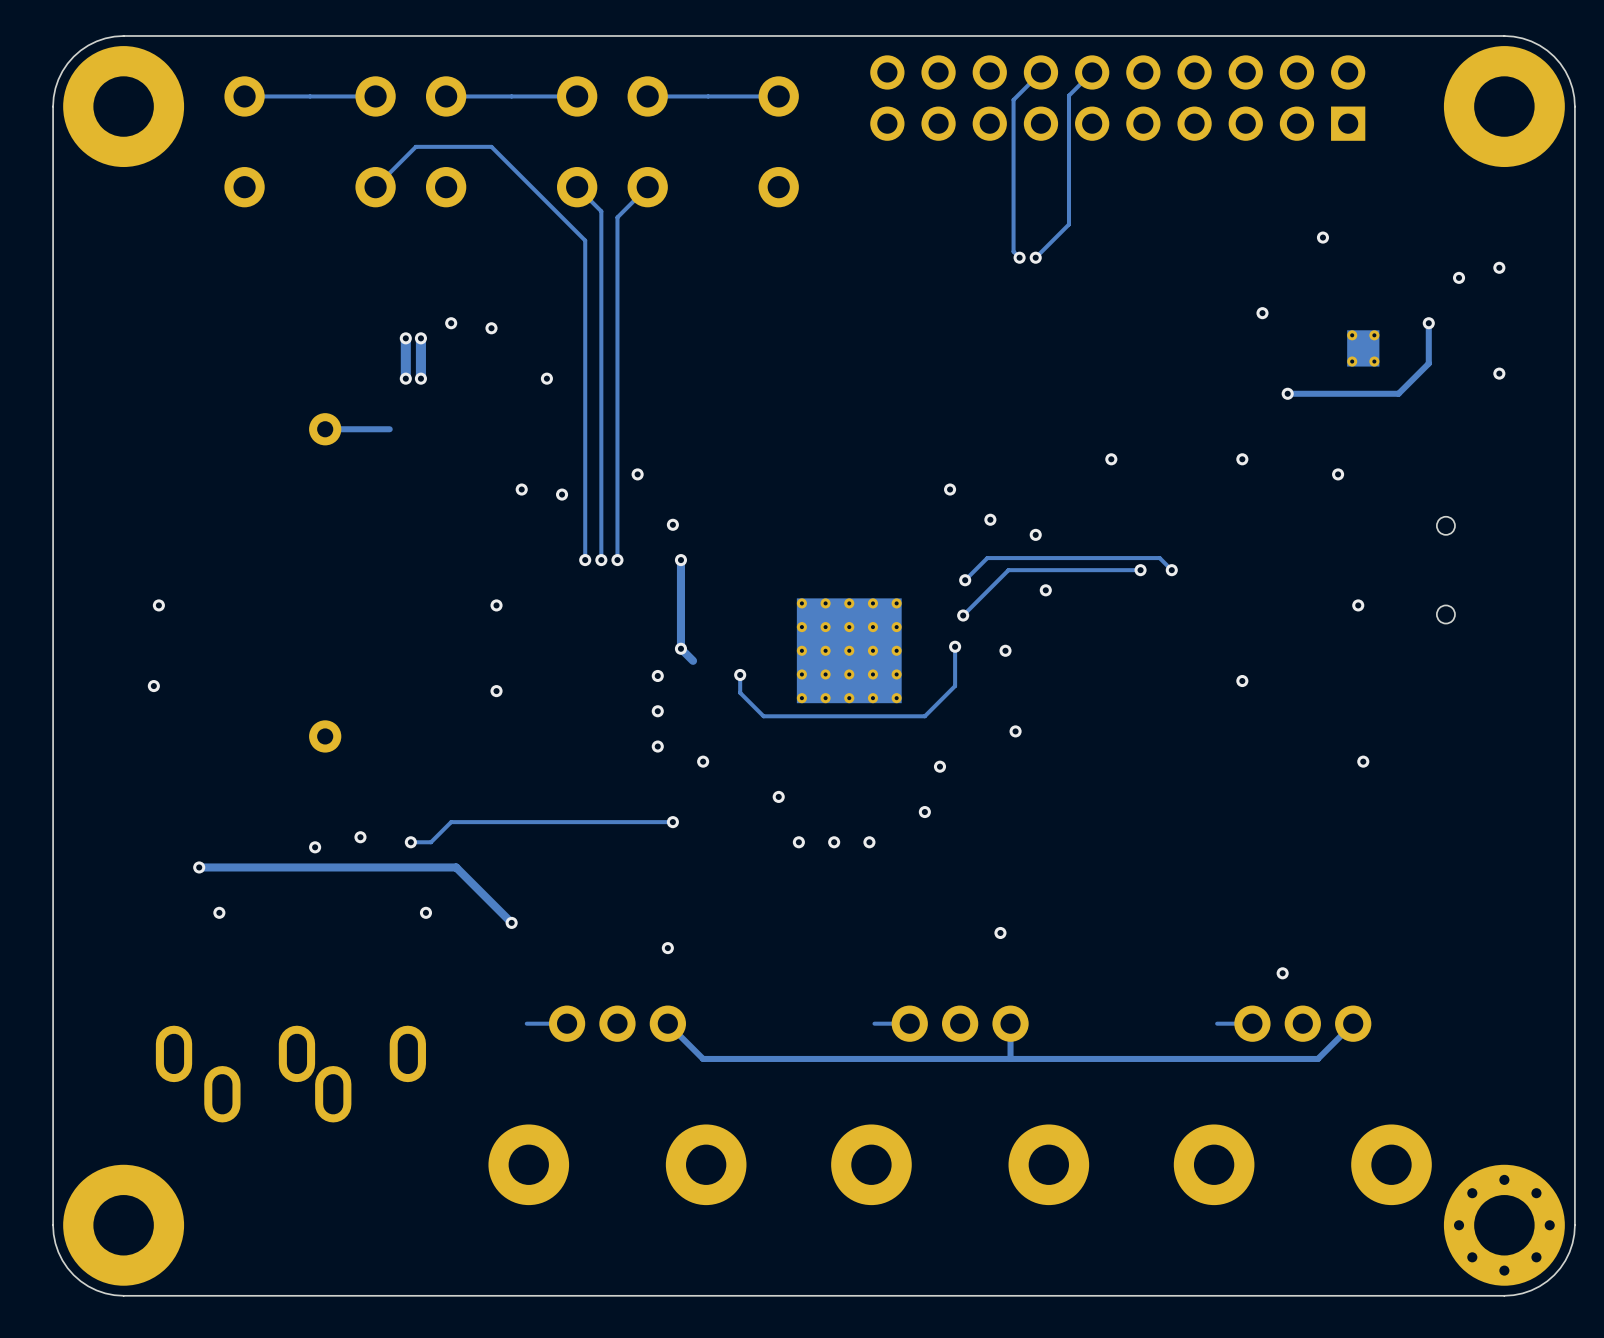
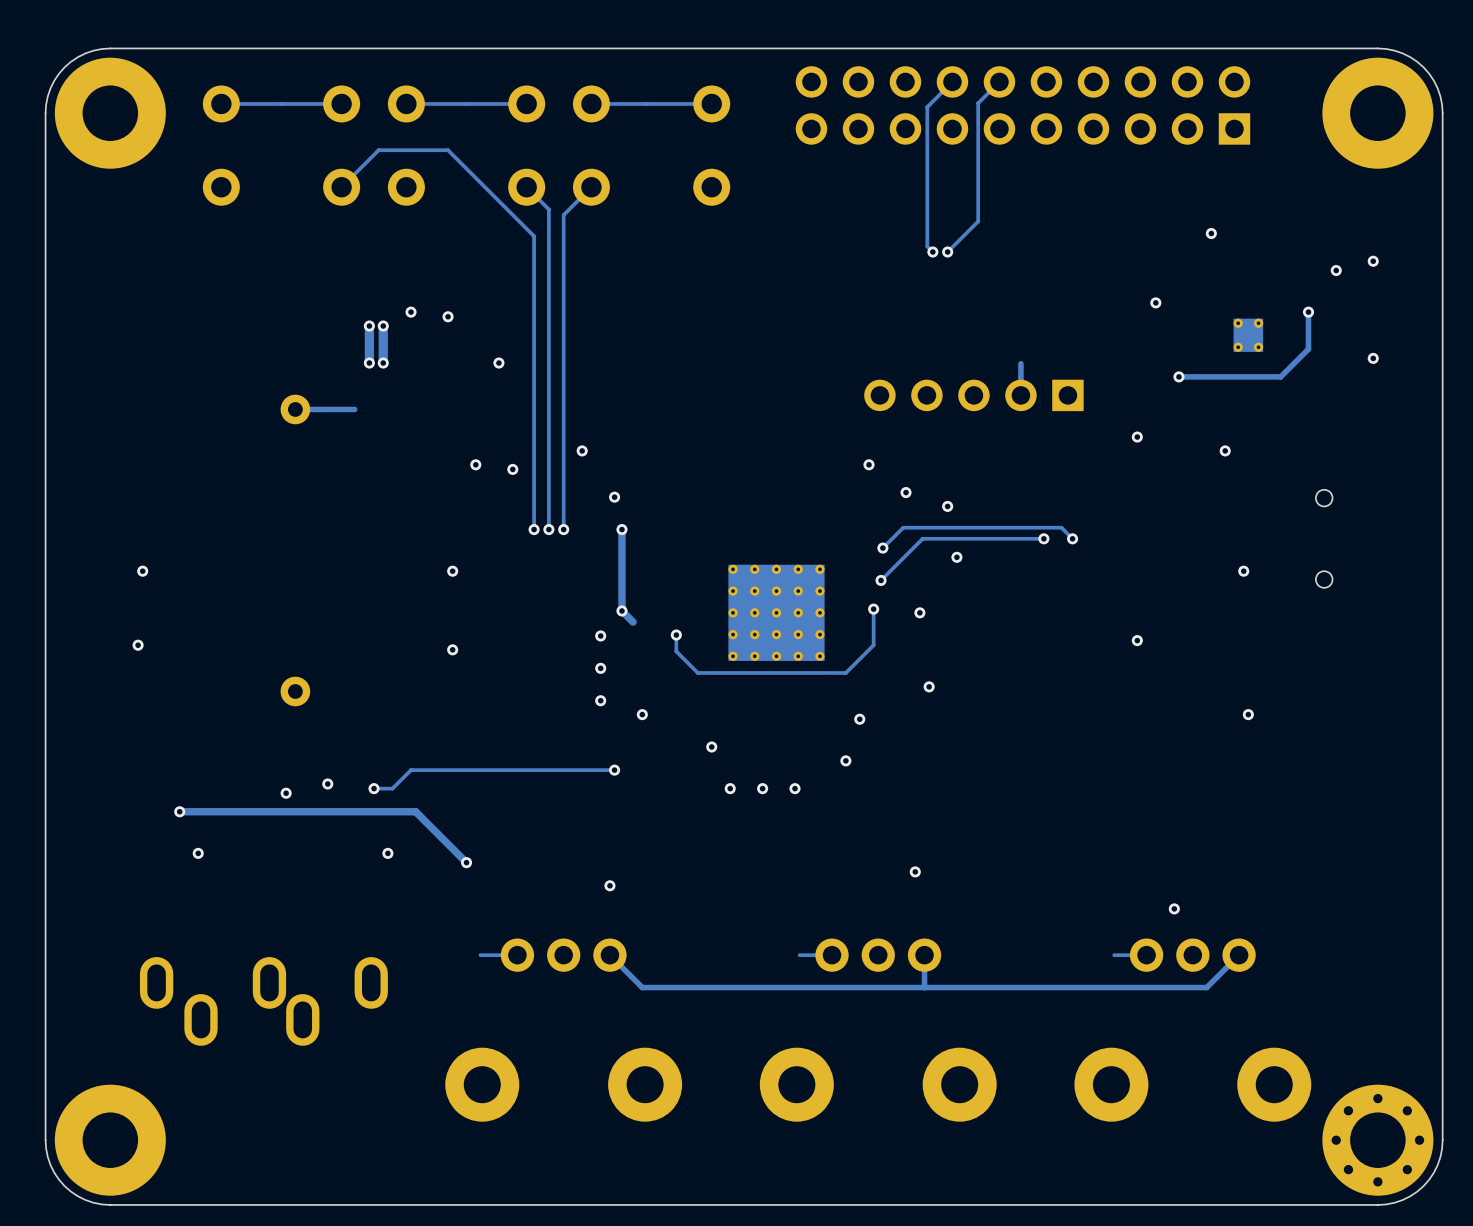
track: none -> (1020, 363) (1020, 395)
part: none -> (973, 395)
via: (1111, 459) -> none

